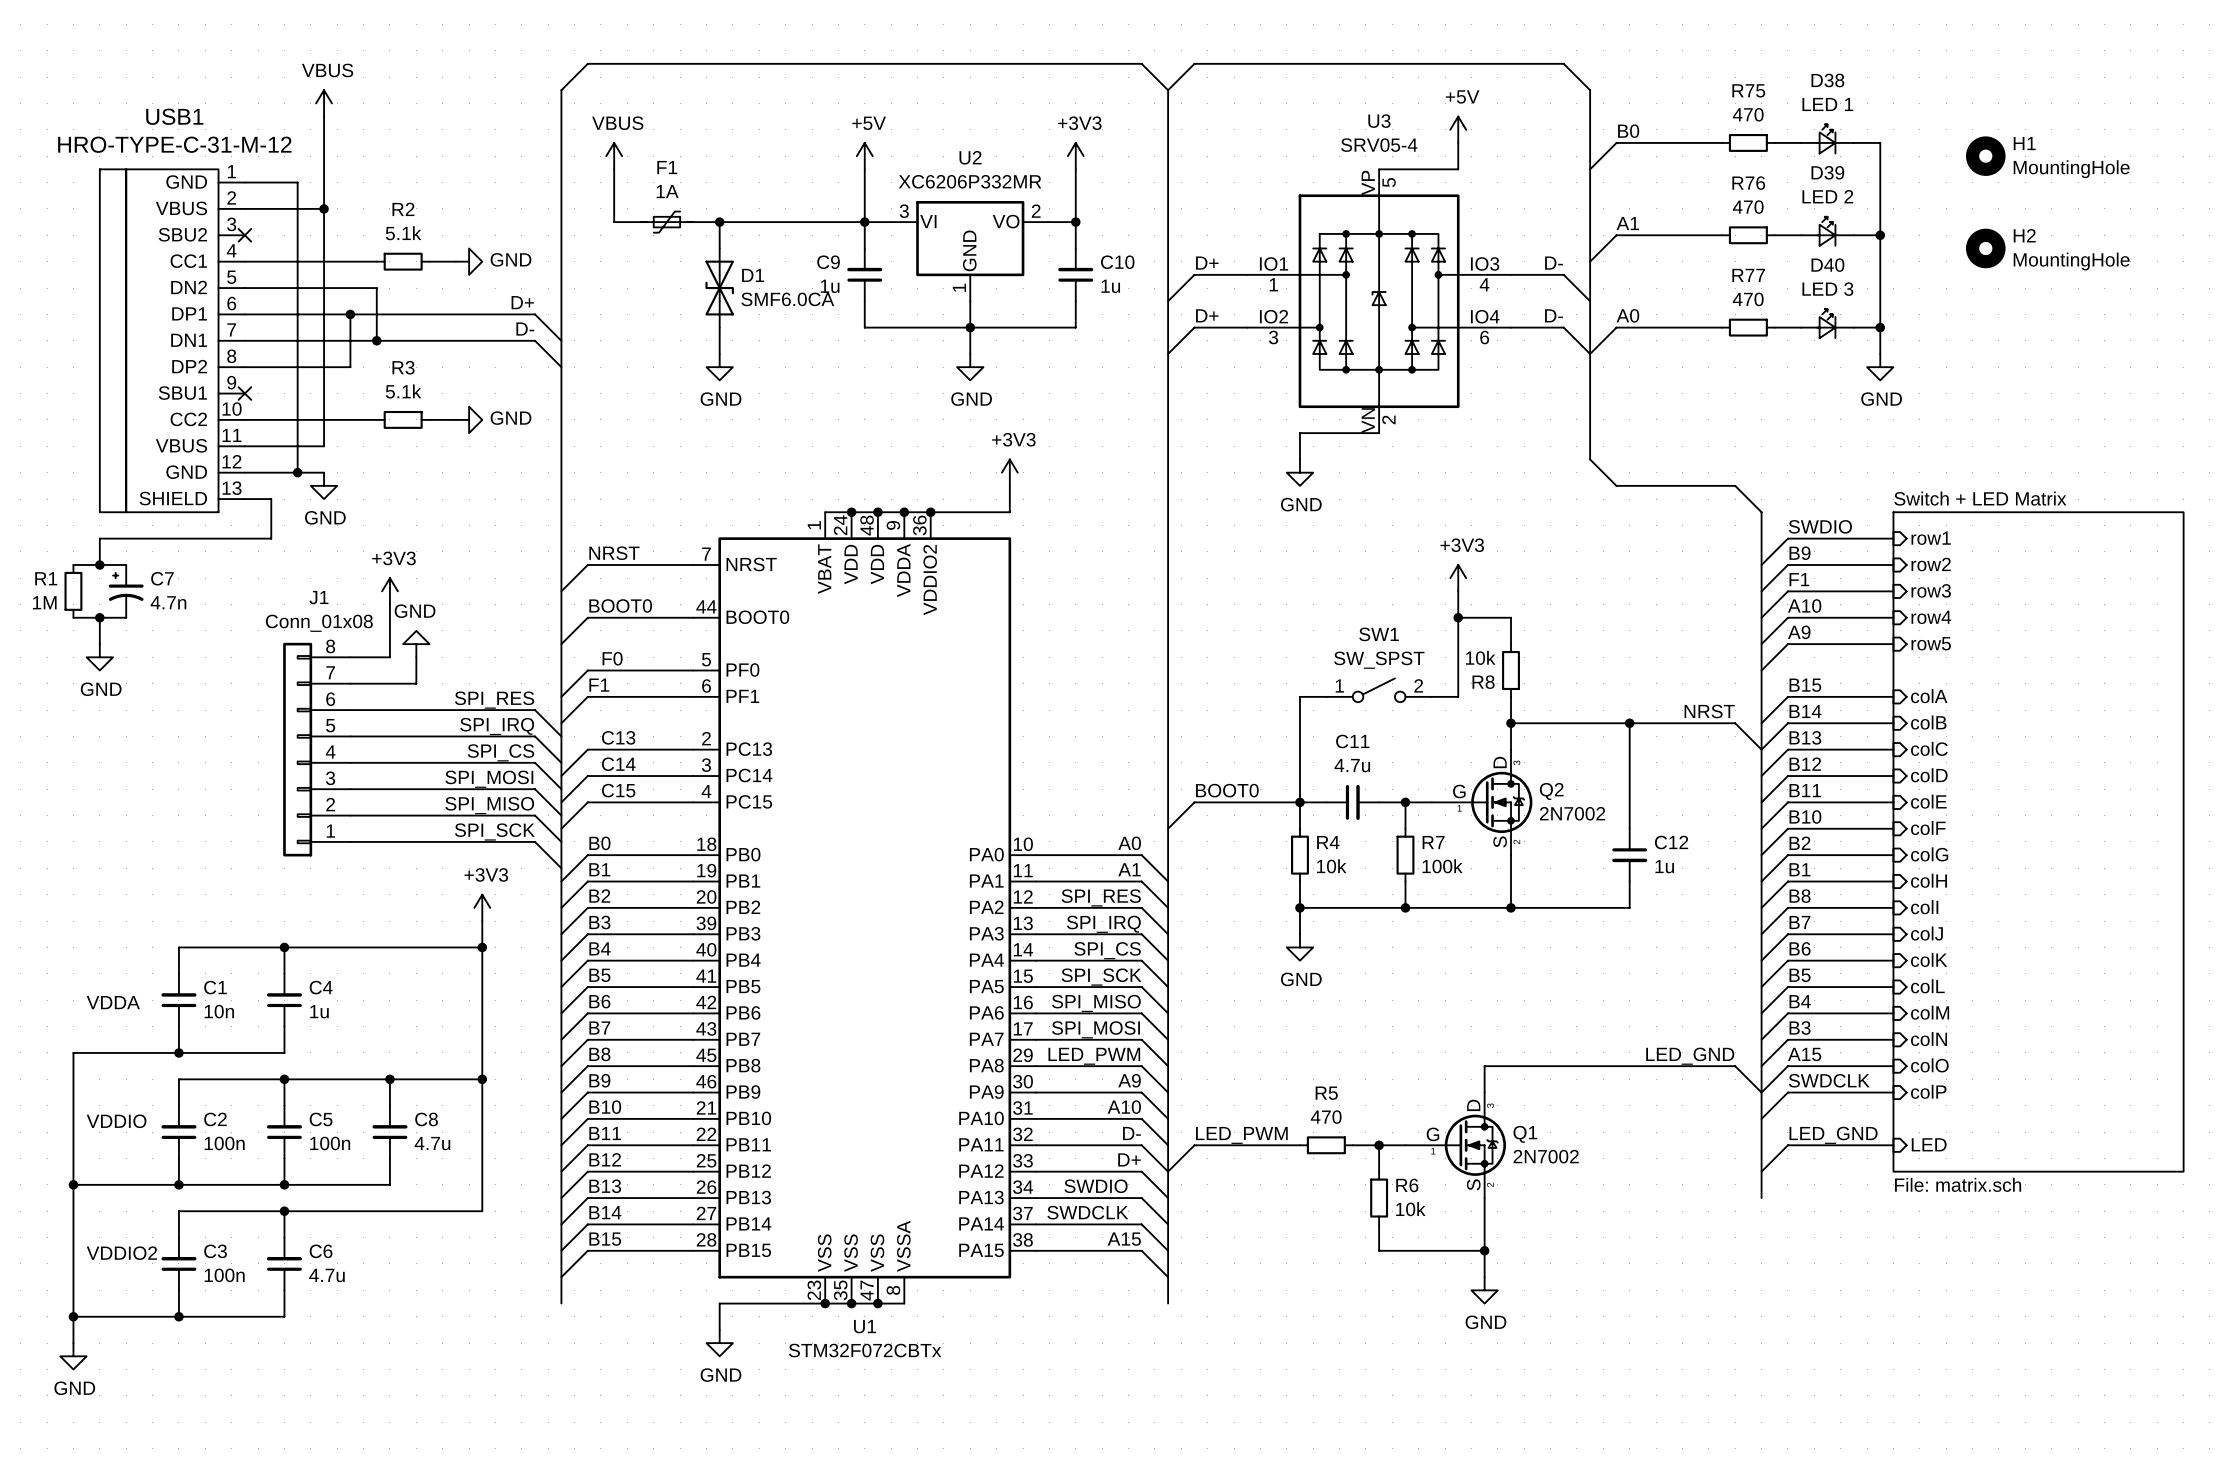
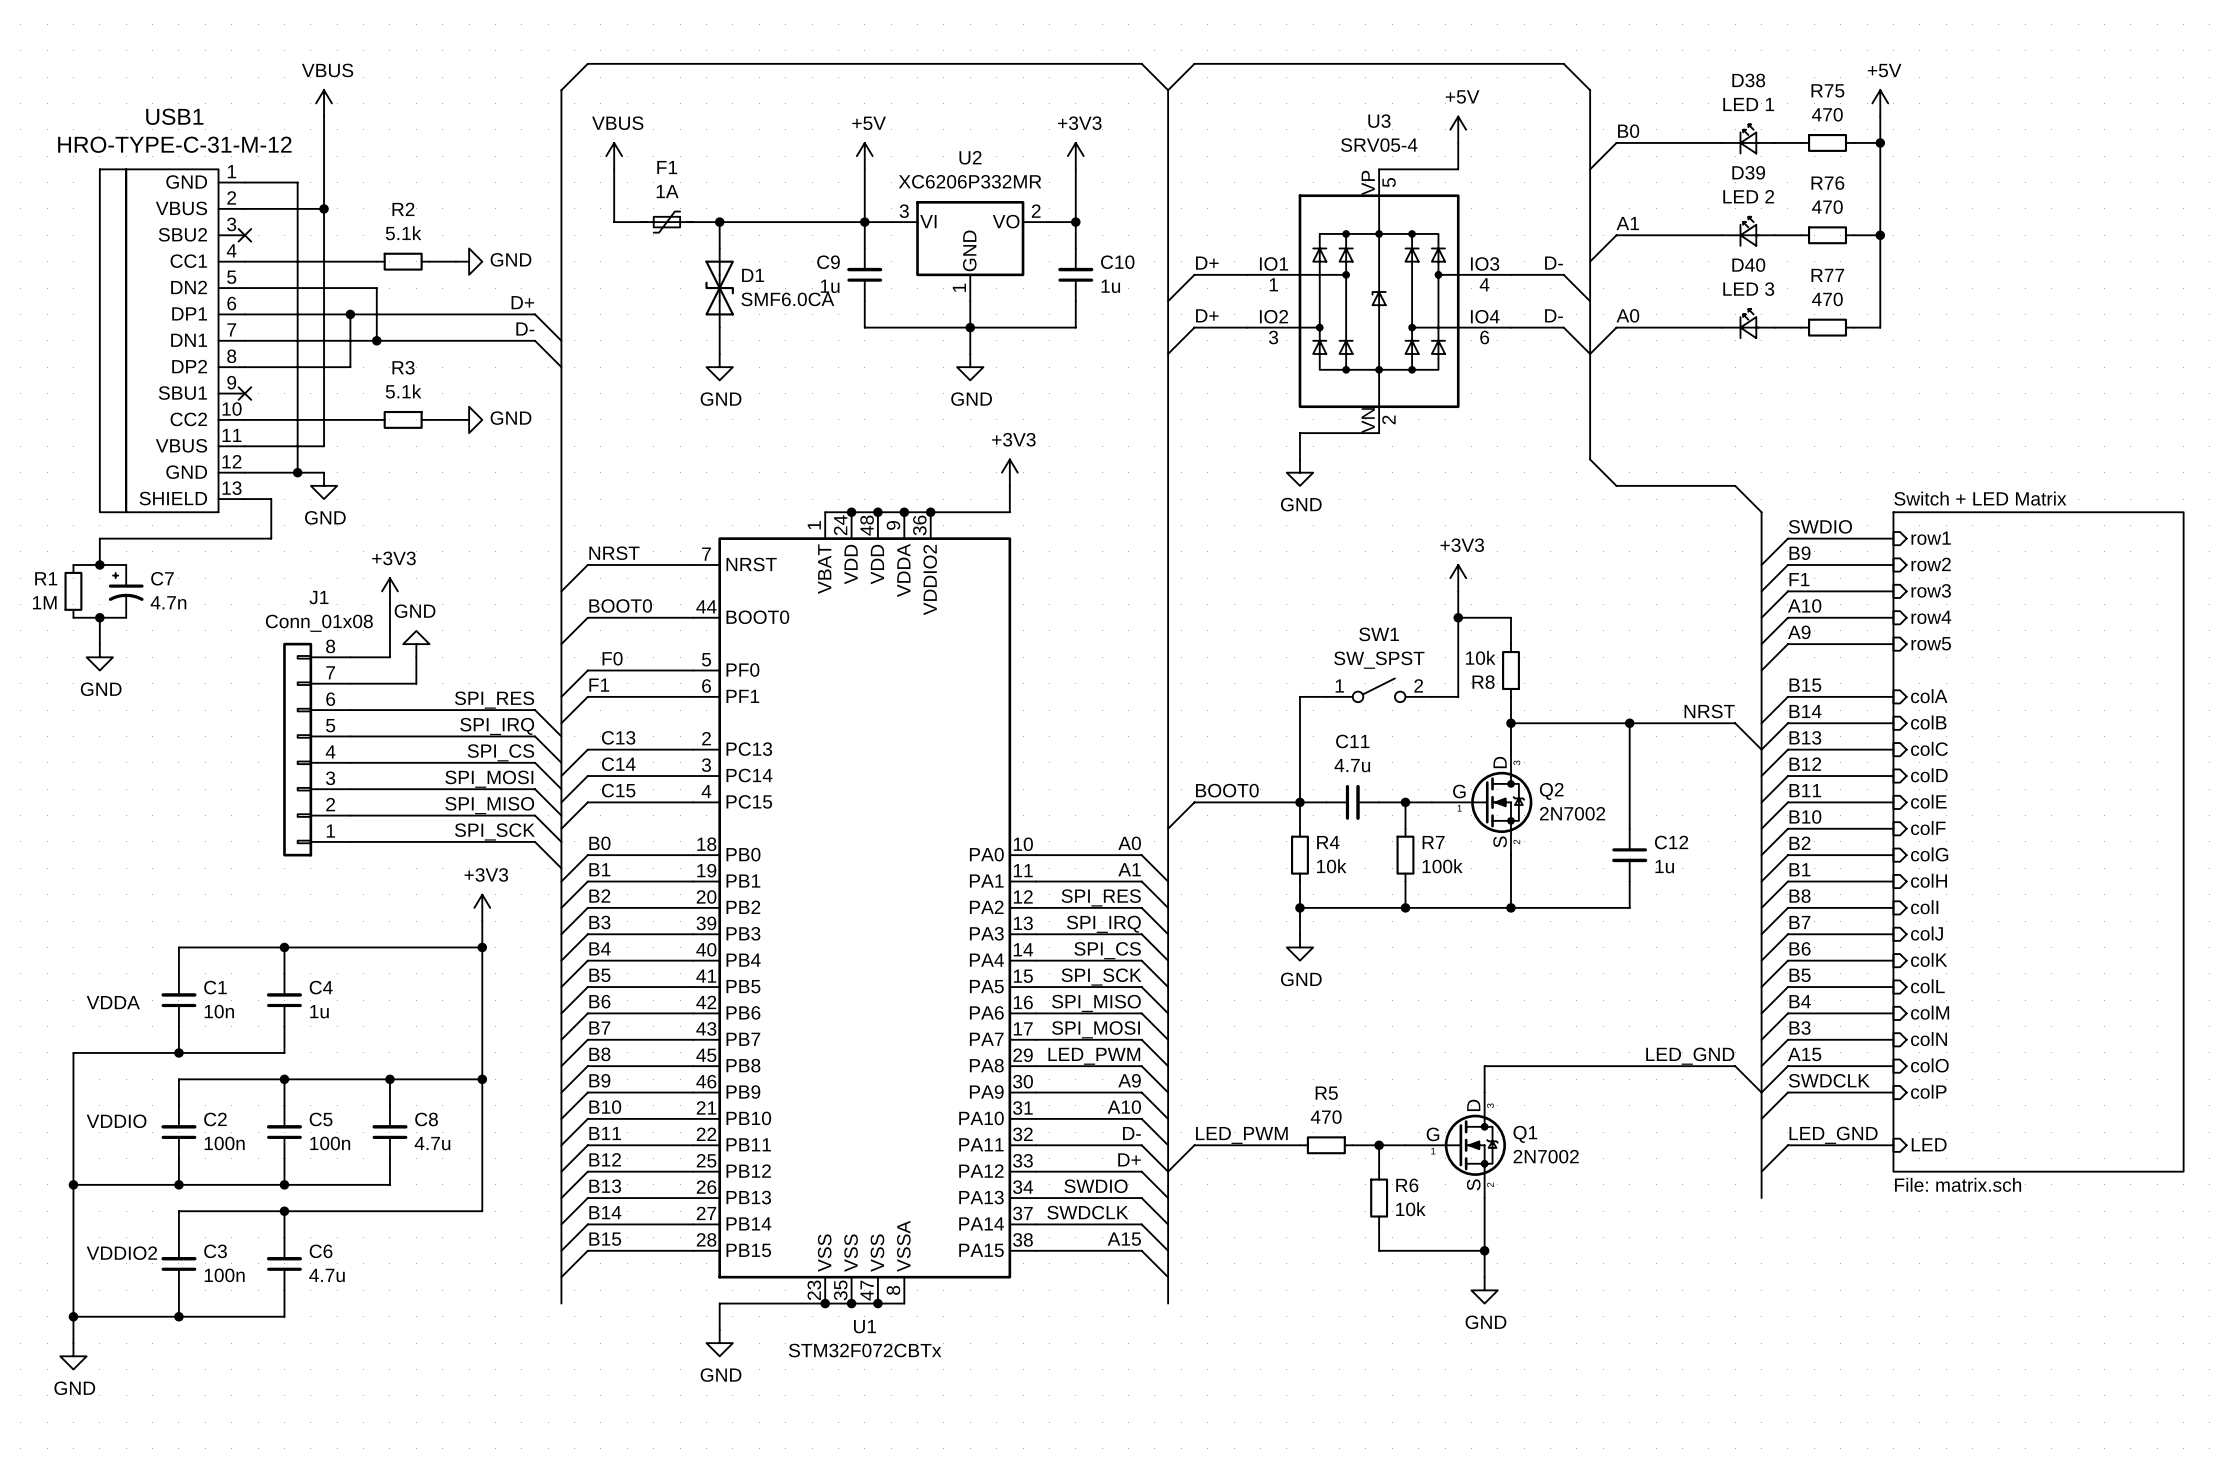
power symbol: none -> +5V (1880, 103)
D38 flip: as is (1826, 139) -> left-right (1749, 139)
D38 position: (1827, 139) -> (1748, 139)
R75 position: (1748, 142) -> (1827, 142)
junction: none -> (1880, 142)
H1: MountingHole (1985, 156) -> none
D39 flip: as is (1826, 231) -> left-right (1749, 231)
D39 position: (1827, 231) -> (1748, 231)
R76 position: (1748, 235) -> (1827, 235)
H2: MountingHole (1985, 248) -> none
D40 flip: as is (1826, 323) -> left-right (1749, 323)
D40 position: (1827, 323) -> (1748, 323)
R77 position: (1748, 327) -> (1827, 327)
wire: (1880, 327) (1880, 353) -> (1880, 116) (1880, 142)
junction: (1880, 327) -> none
power symbol: GND (1880, 367) -> none

